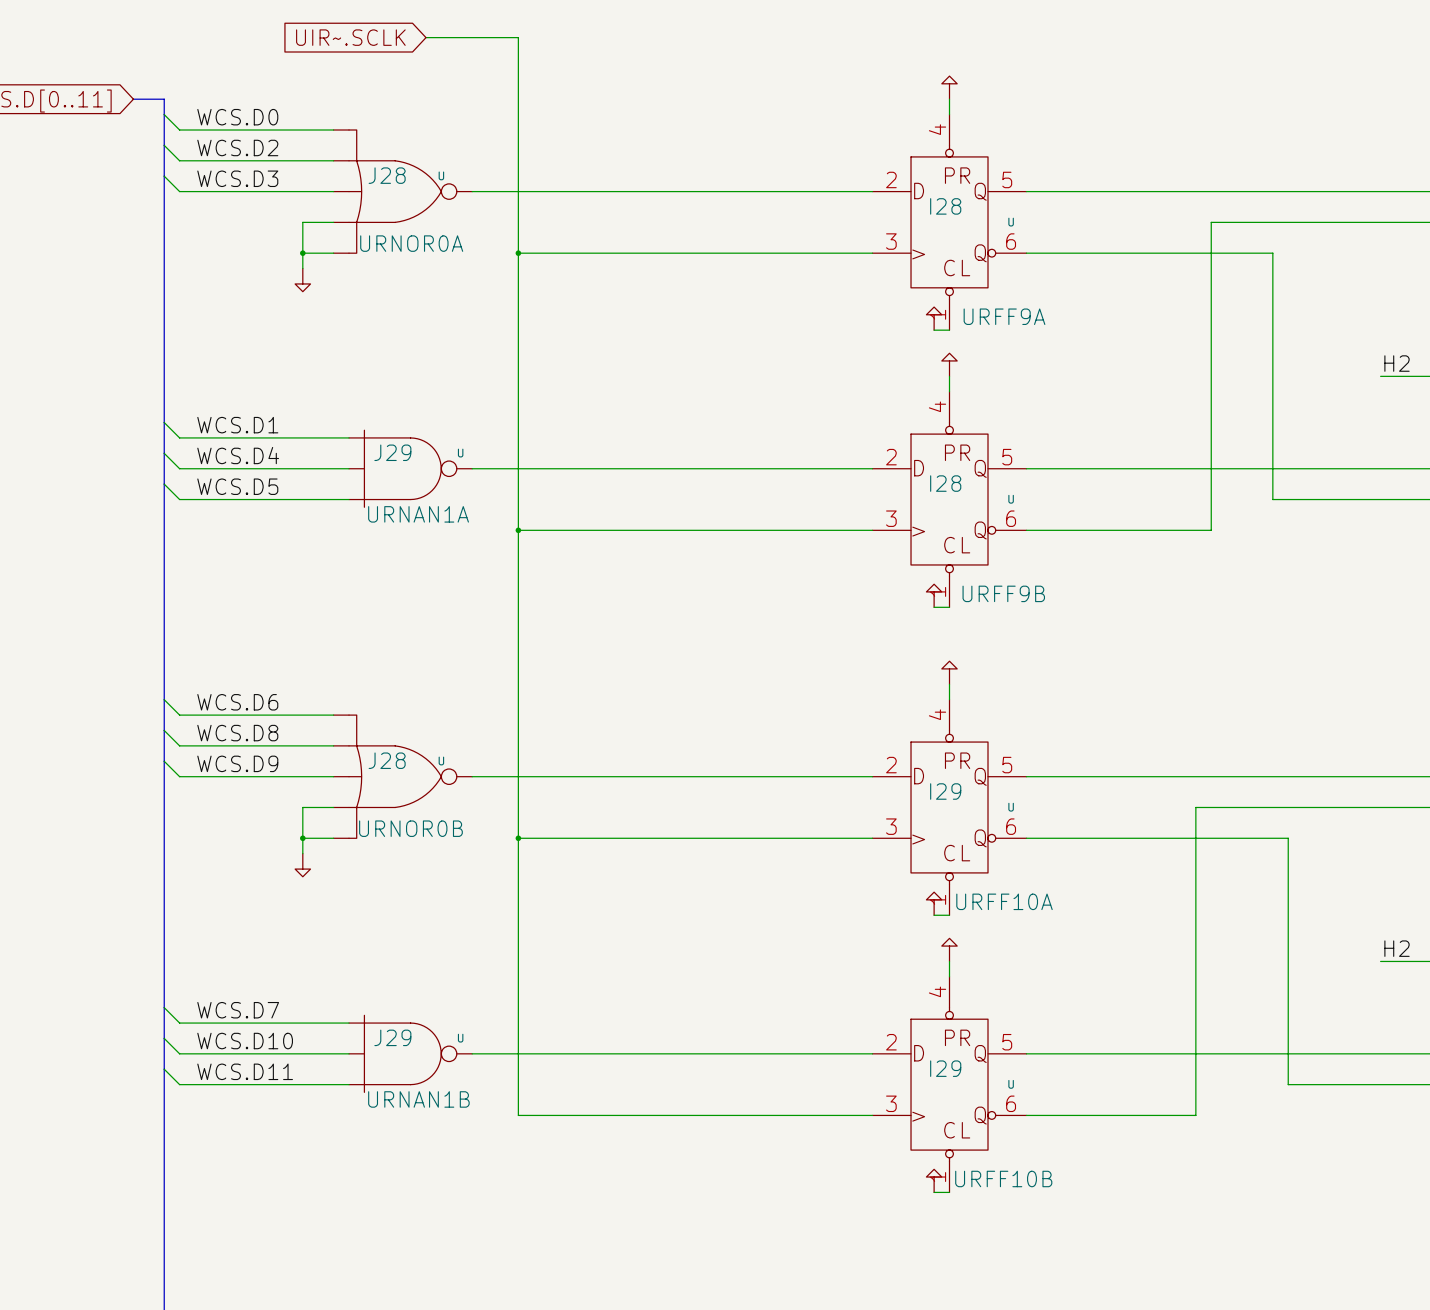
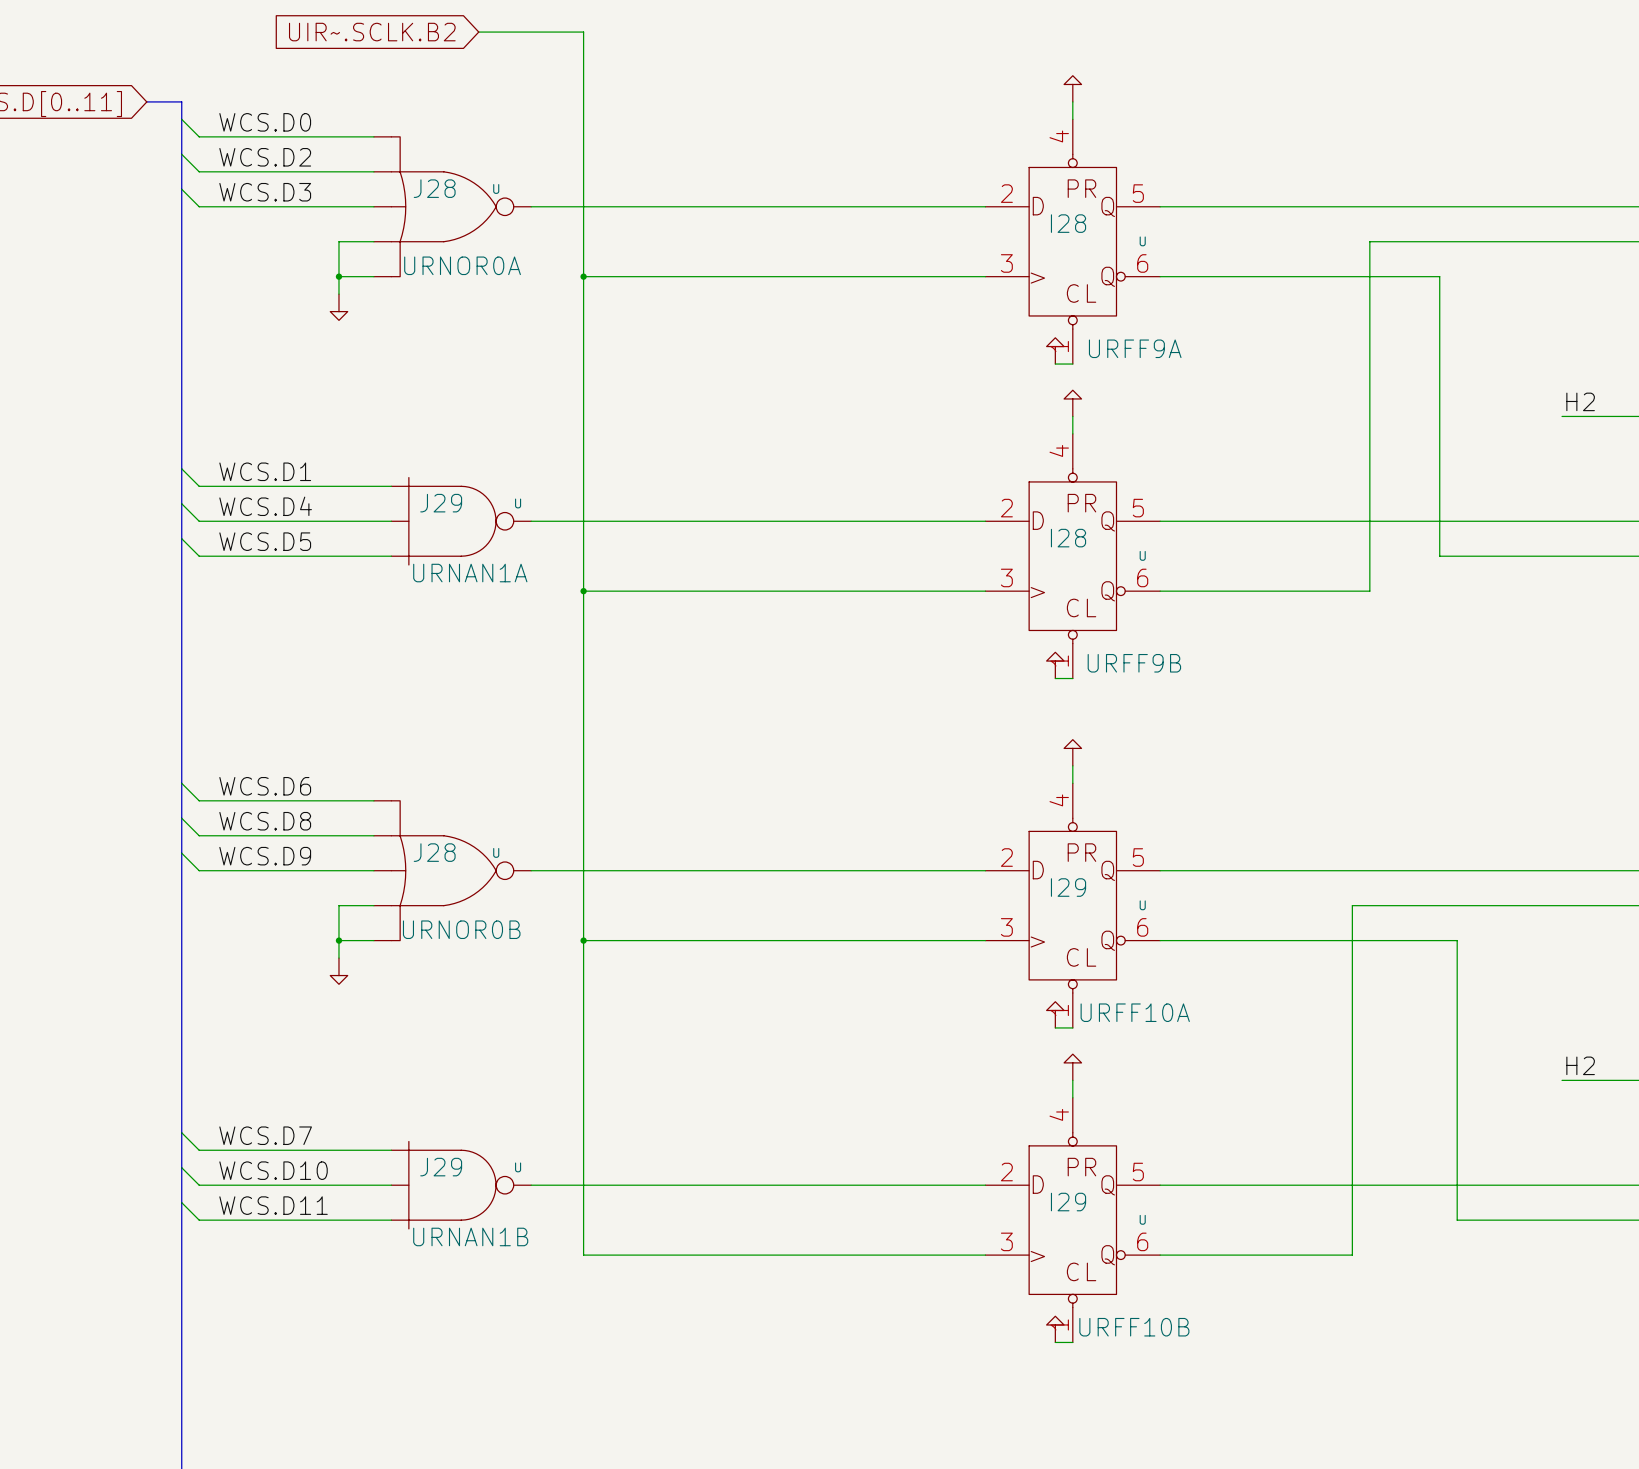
global label: UIR~.SCLK (350, 37) -> UIR~.SCLK.B2 (372, 32)

